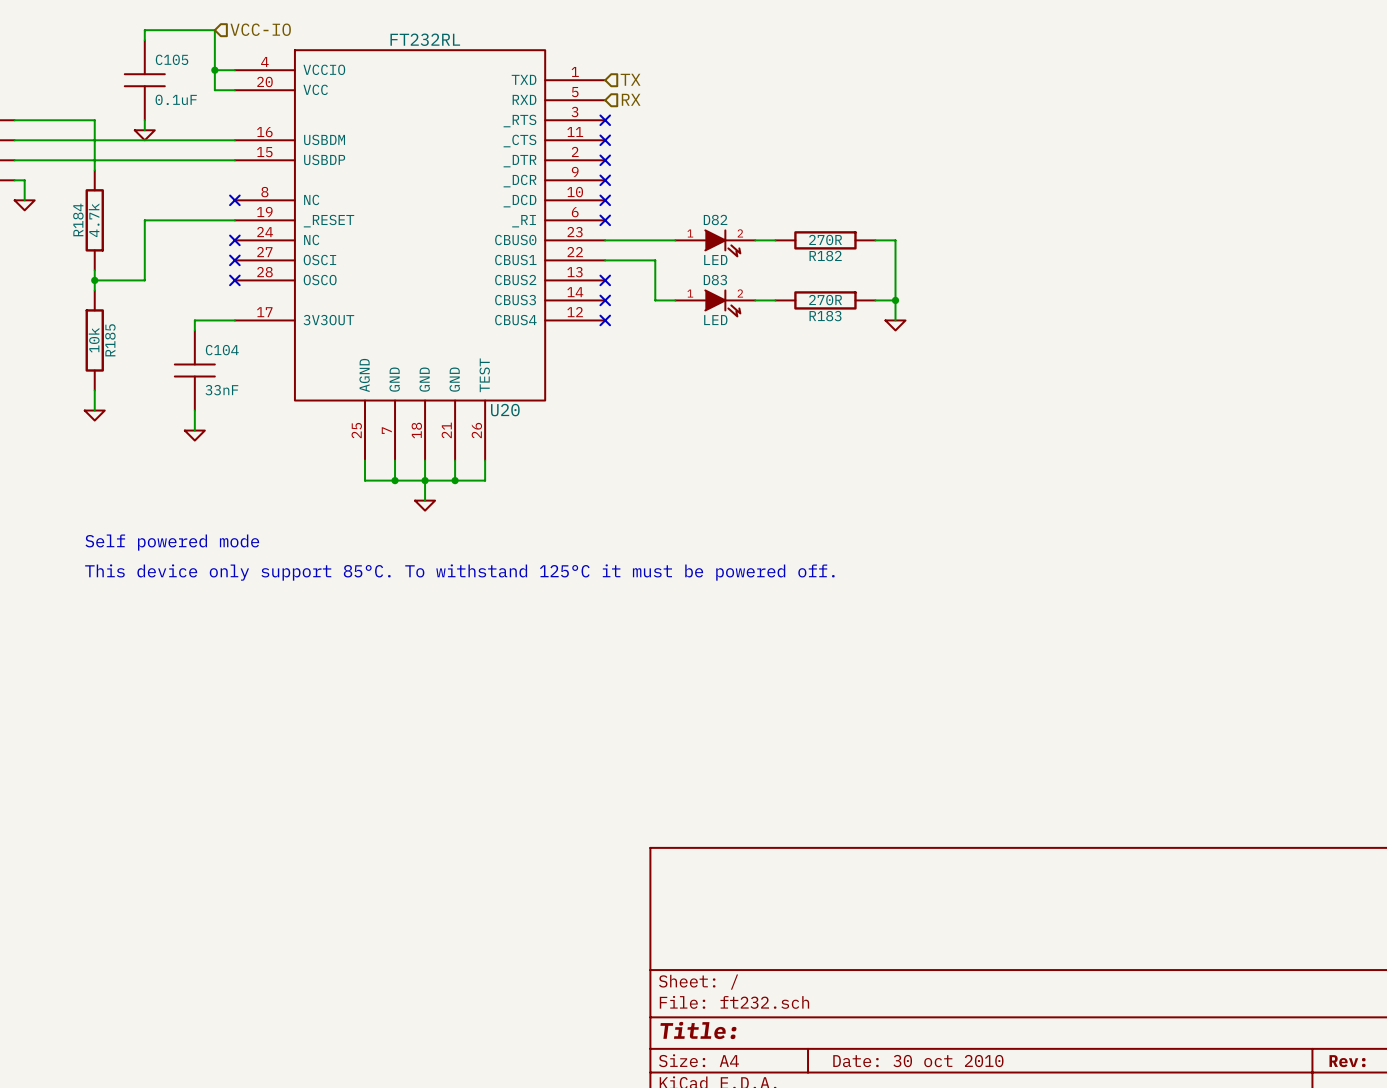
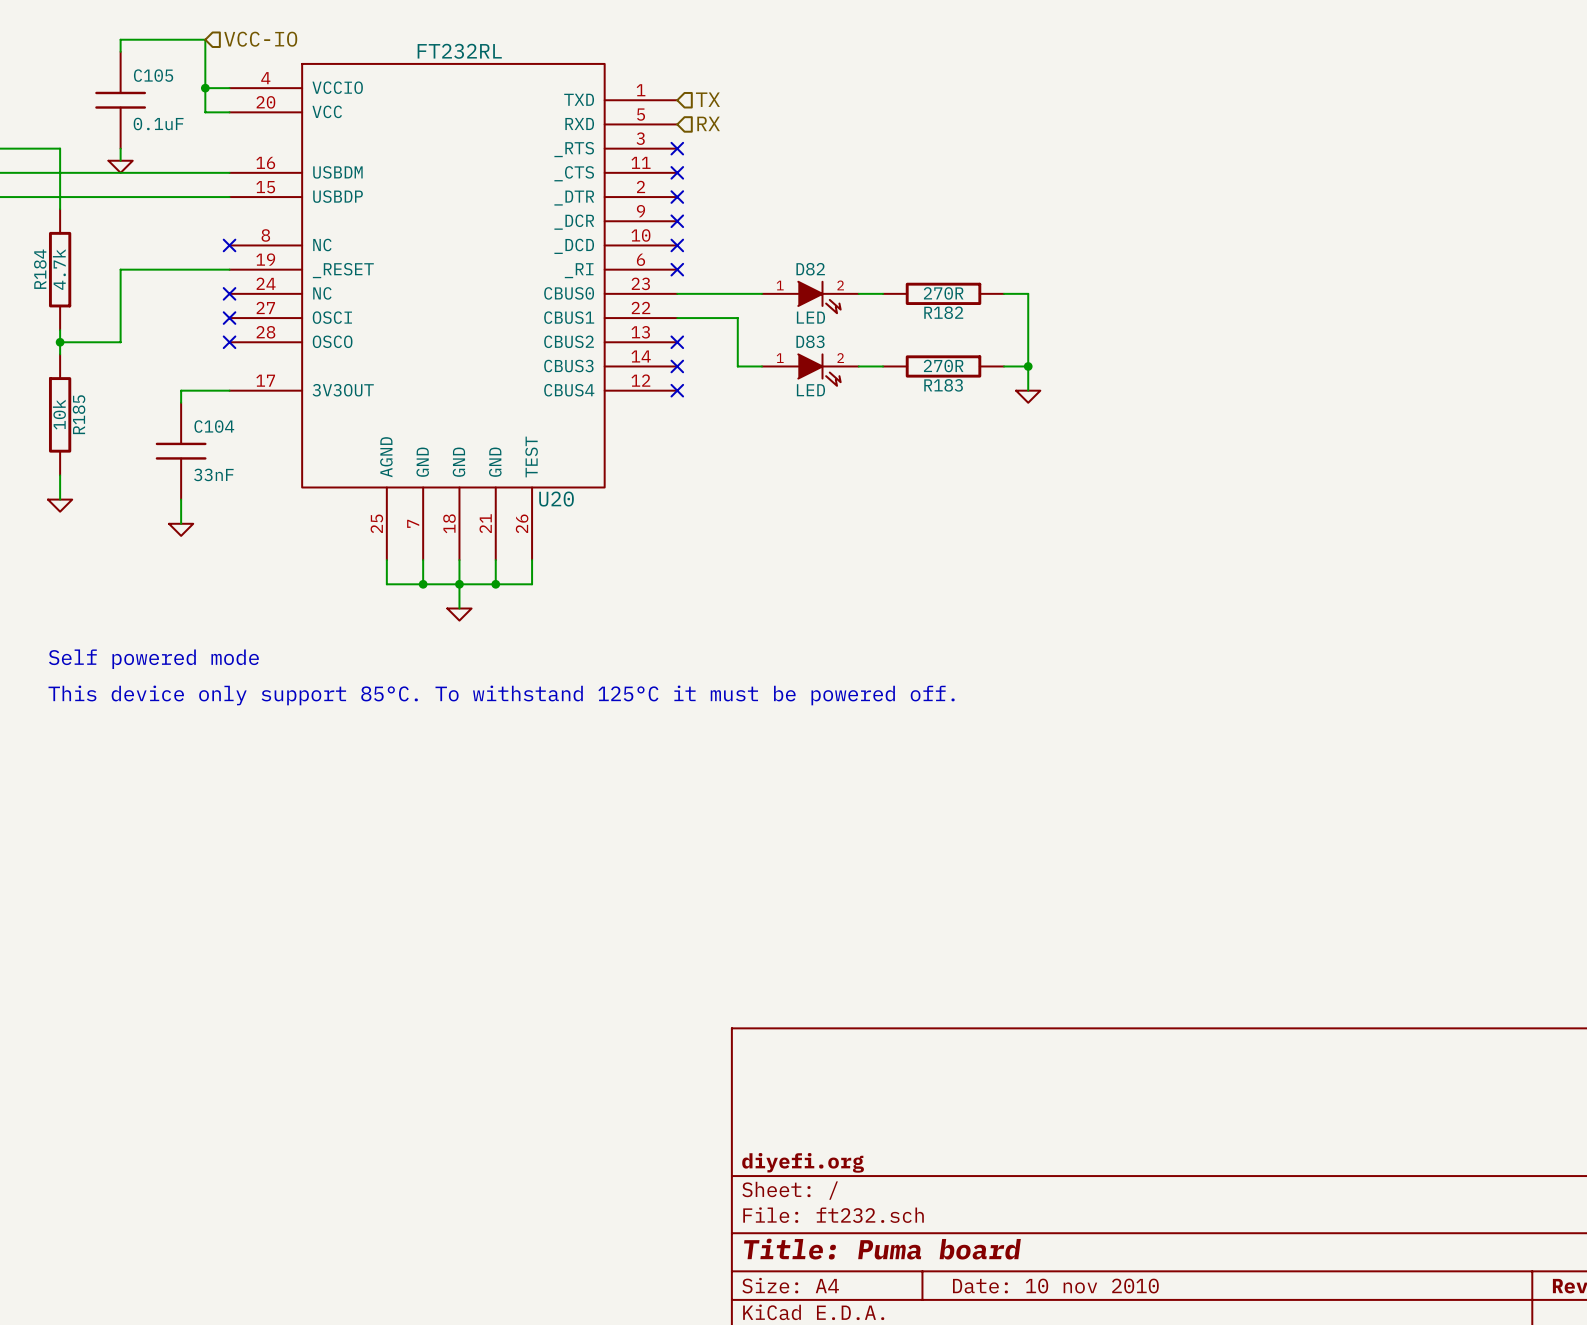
title block: none -> diyefi.org (803, 1162)
title block: Title: (698, 1030) -> Title: Puma board (882, 1249)
title block: Date: 30 oct 2010 (918, 1061) -> Date: 10 nov 2010 (1055, 1286)

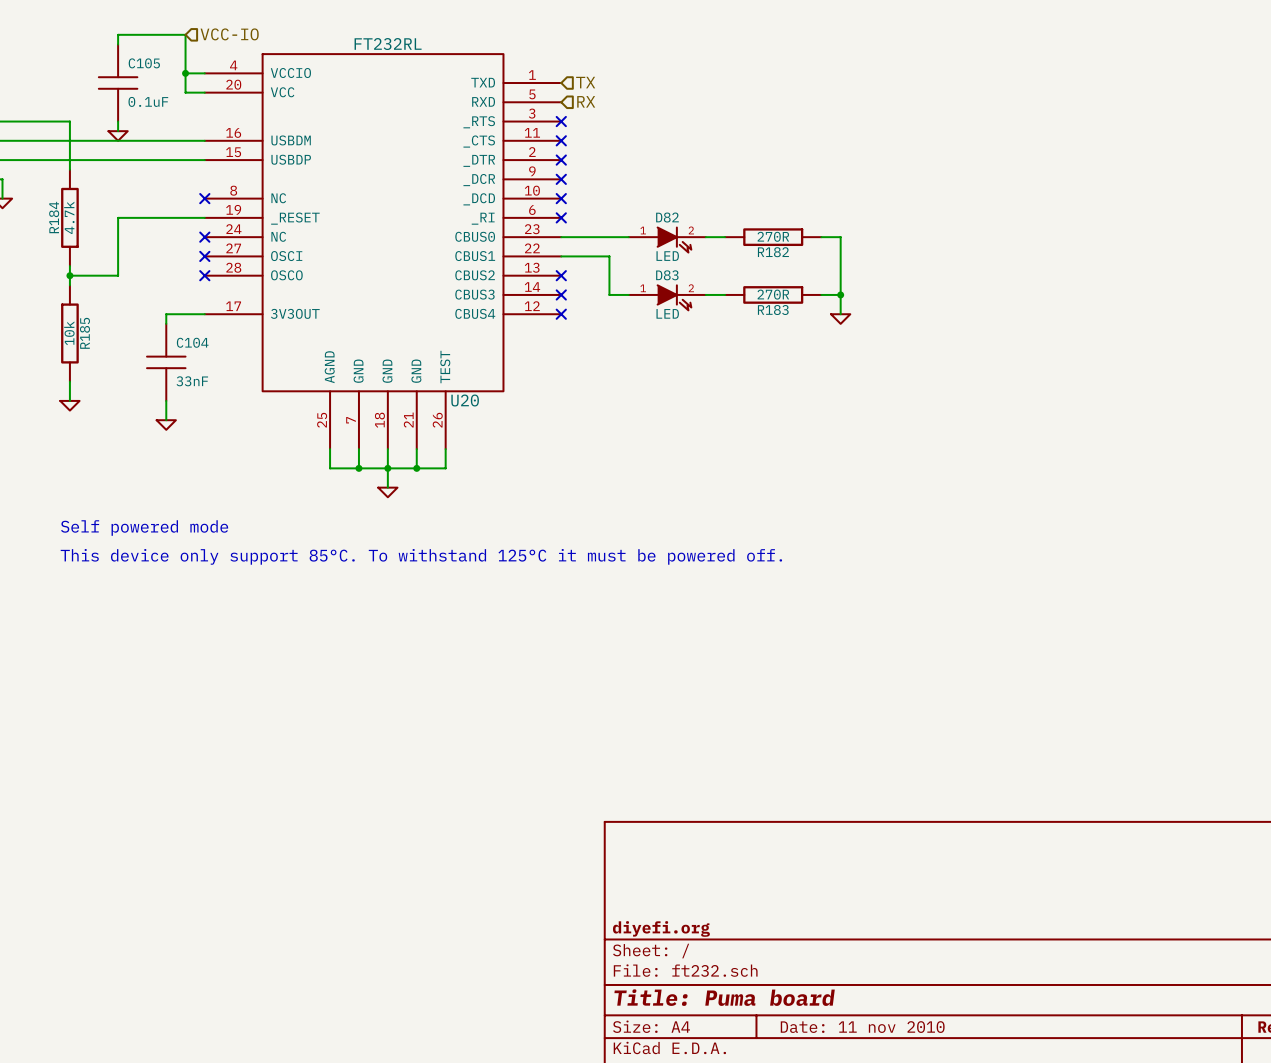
title block: Date: 10 nov 2010 (1055, 1286) -> Date: 11 nov 2010 (862, 1027)

